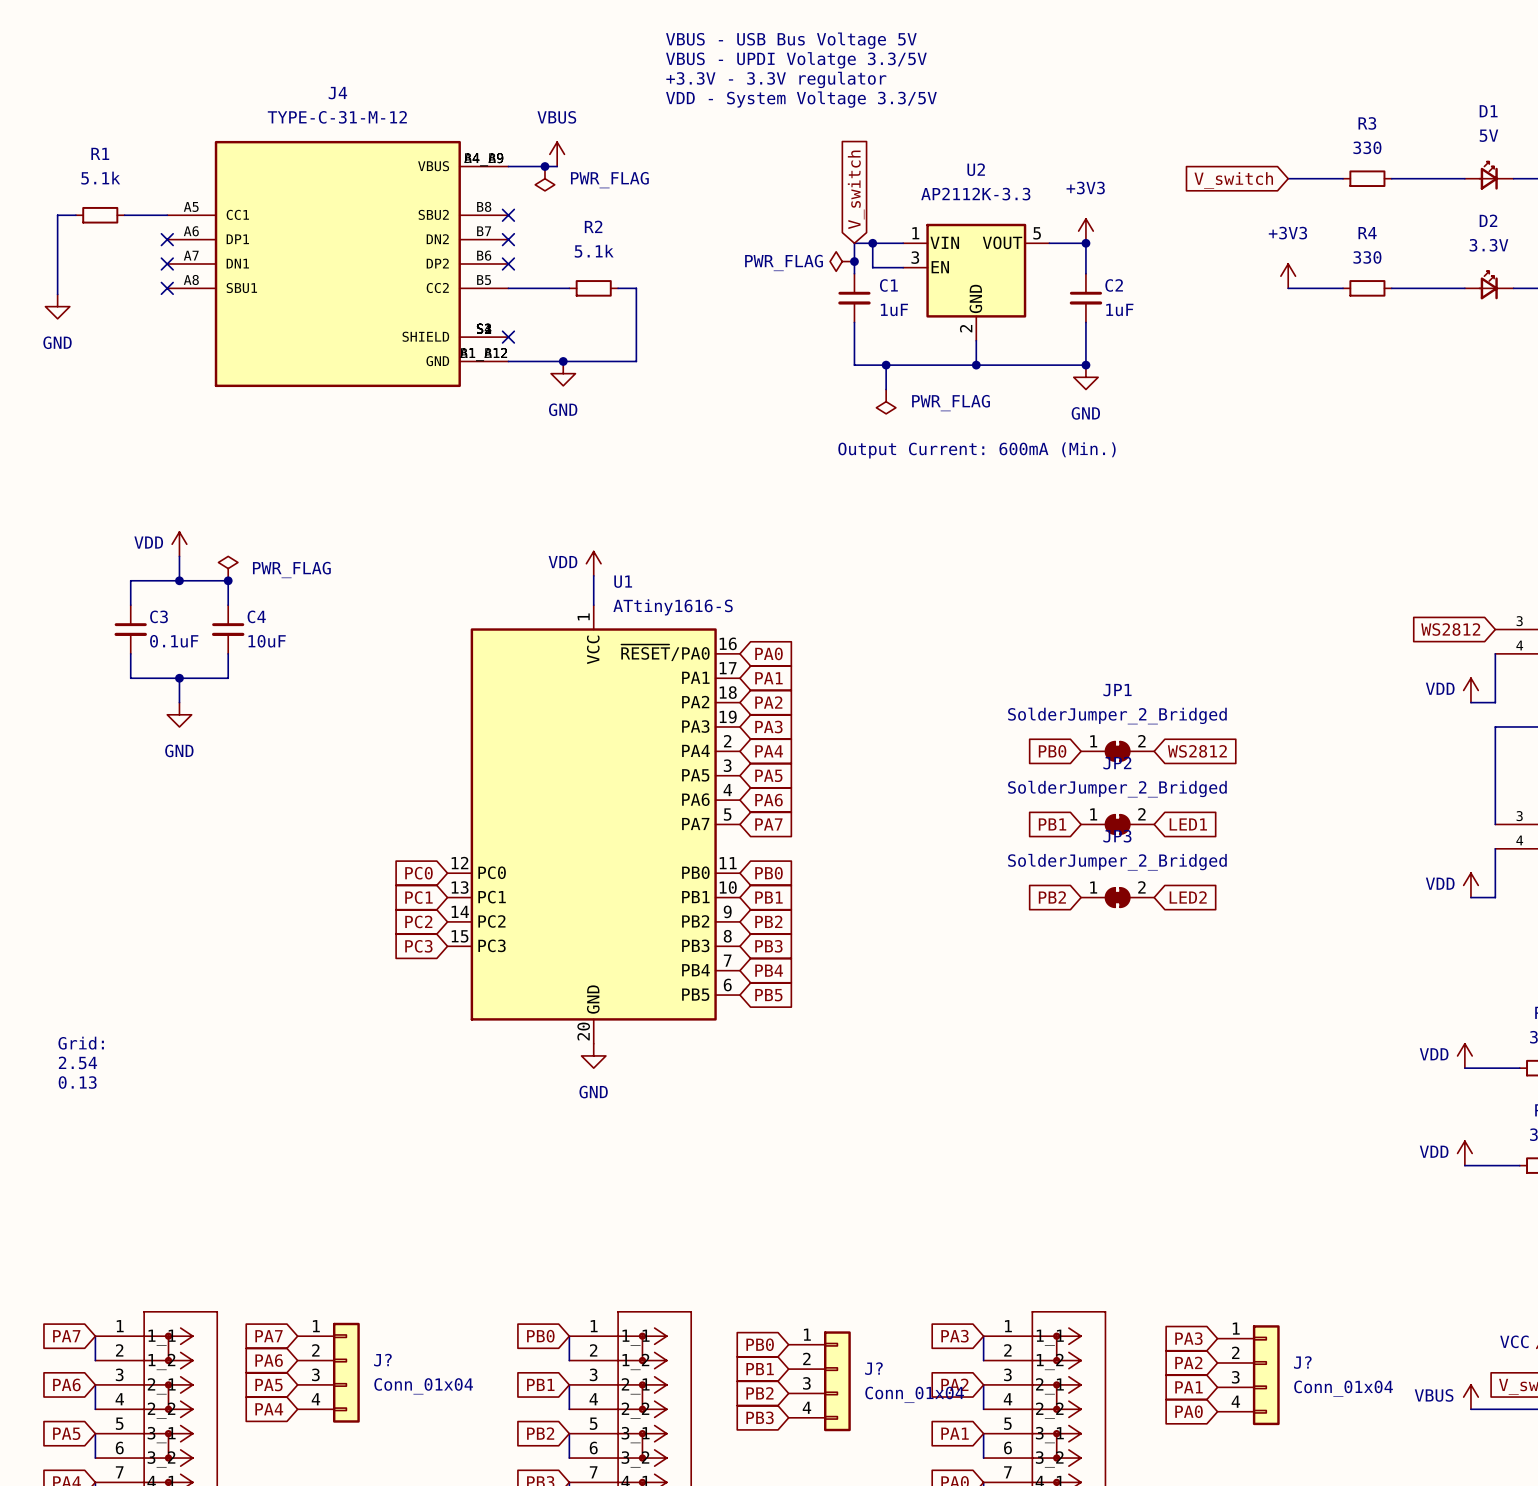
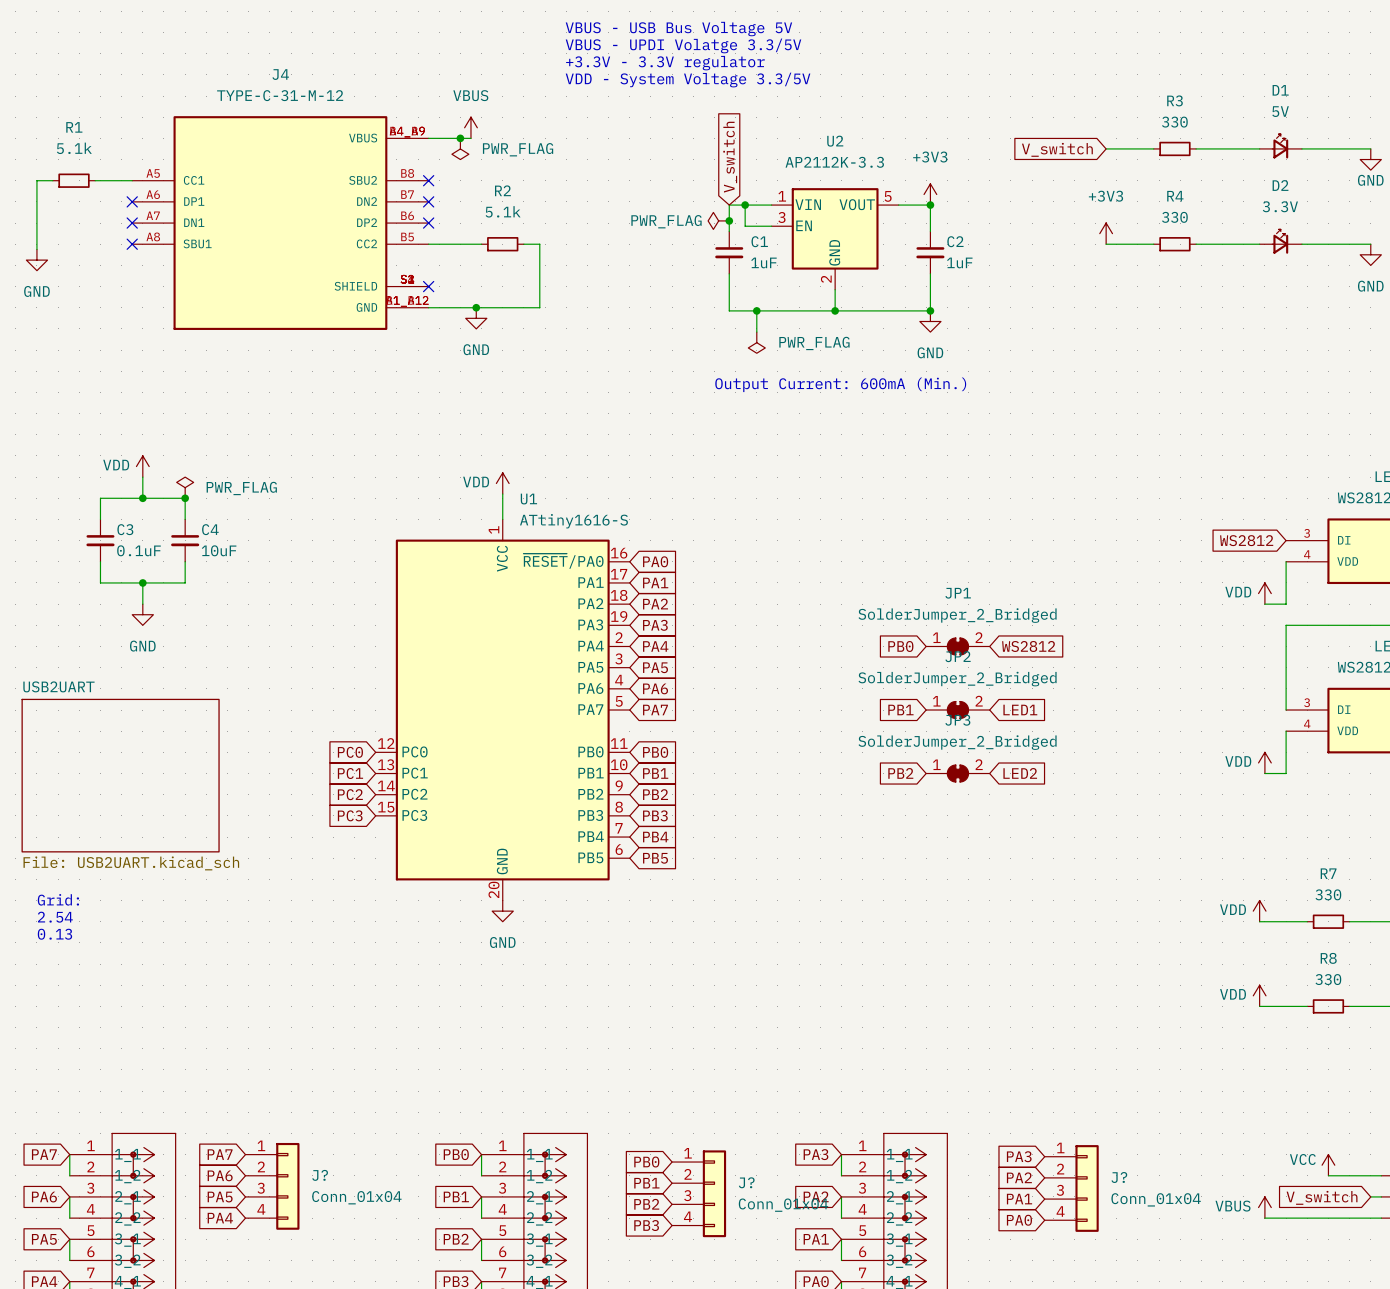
sheet USB2UART: none -> File: USB2UART.kicad_sch (120, 775)

